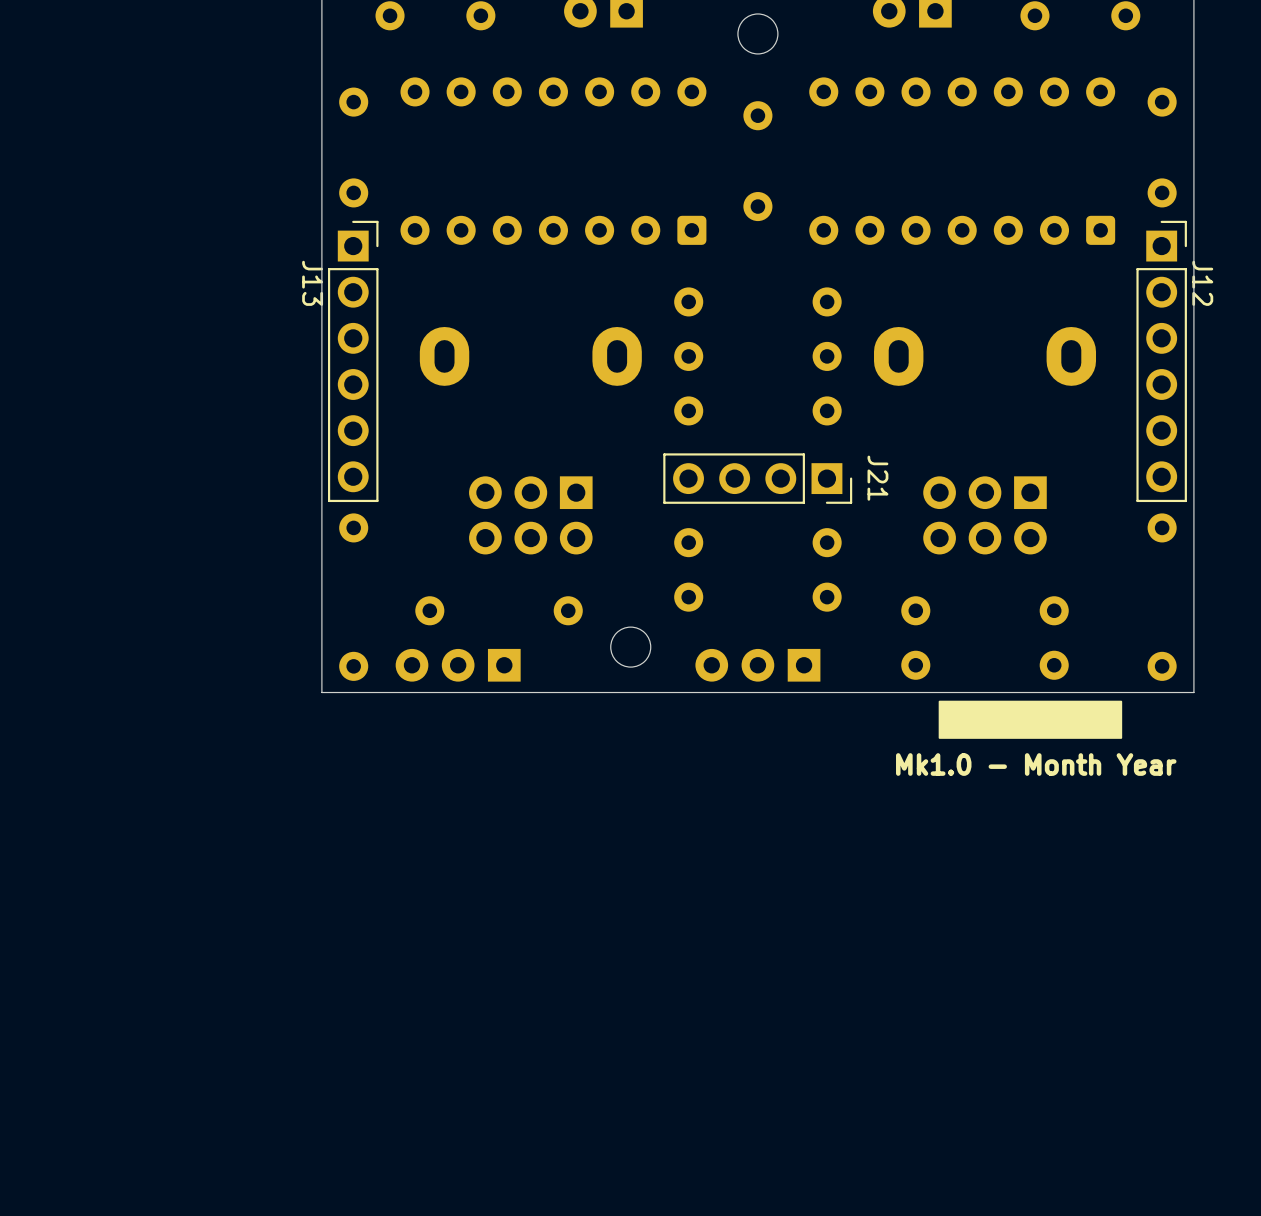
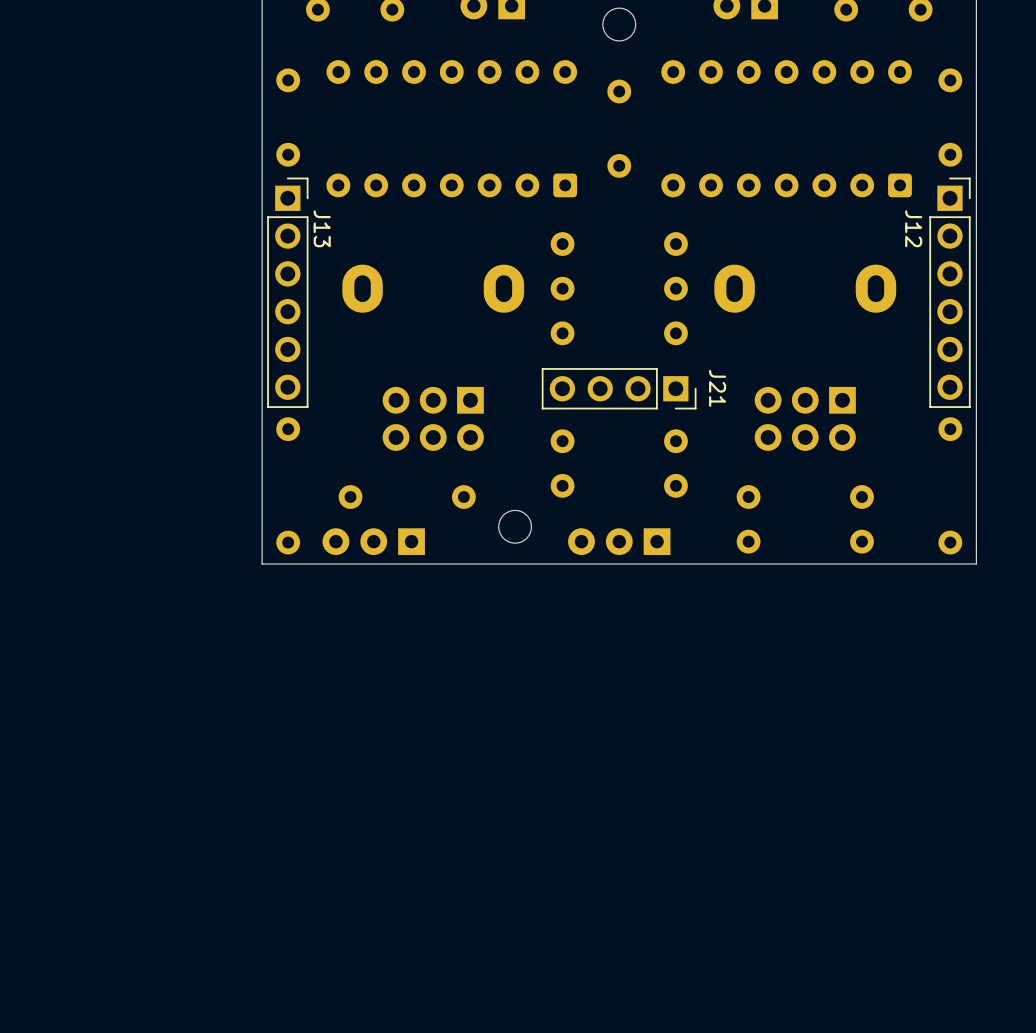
J13 name position: J13 (312, 283) -> J13 (322, 228)
J12 name position: J12 (1202, 283) -> J12 (913, 228)
drawing: [938, 700, 1123, 739] -> none
text: Mk1.0 - Month Year (1036, 764) -> none

